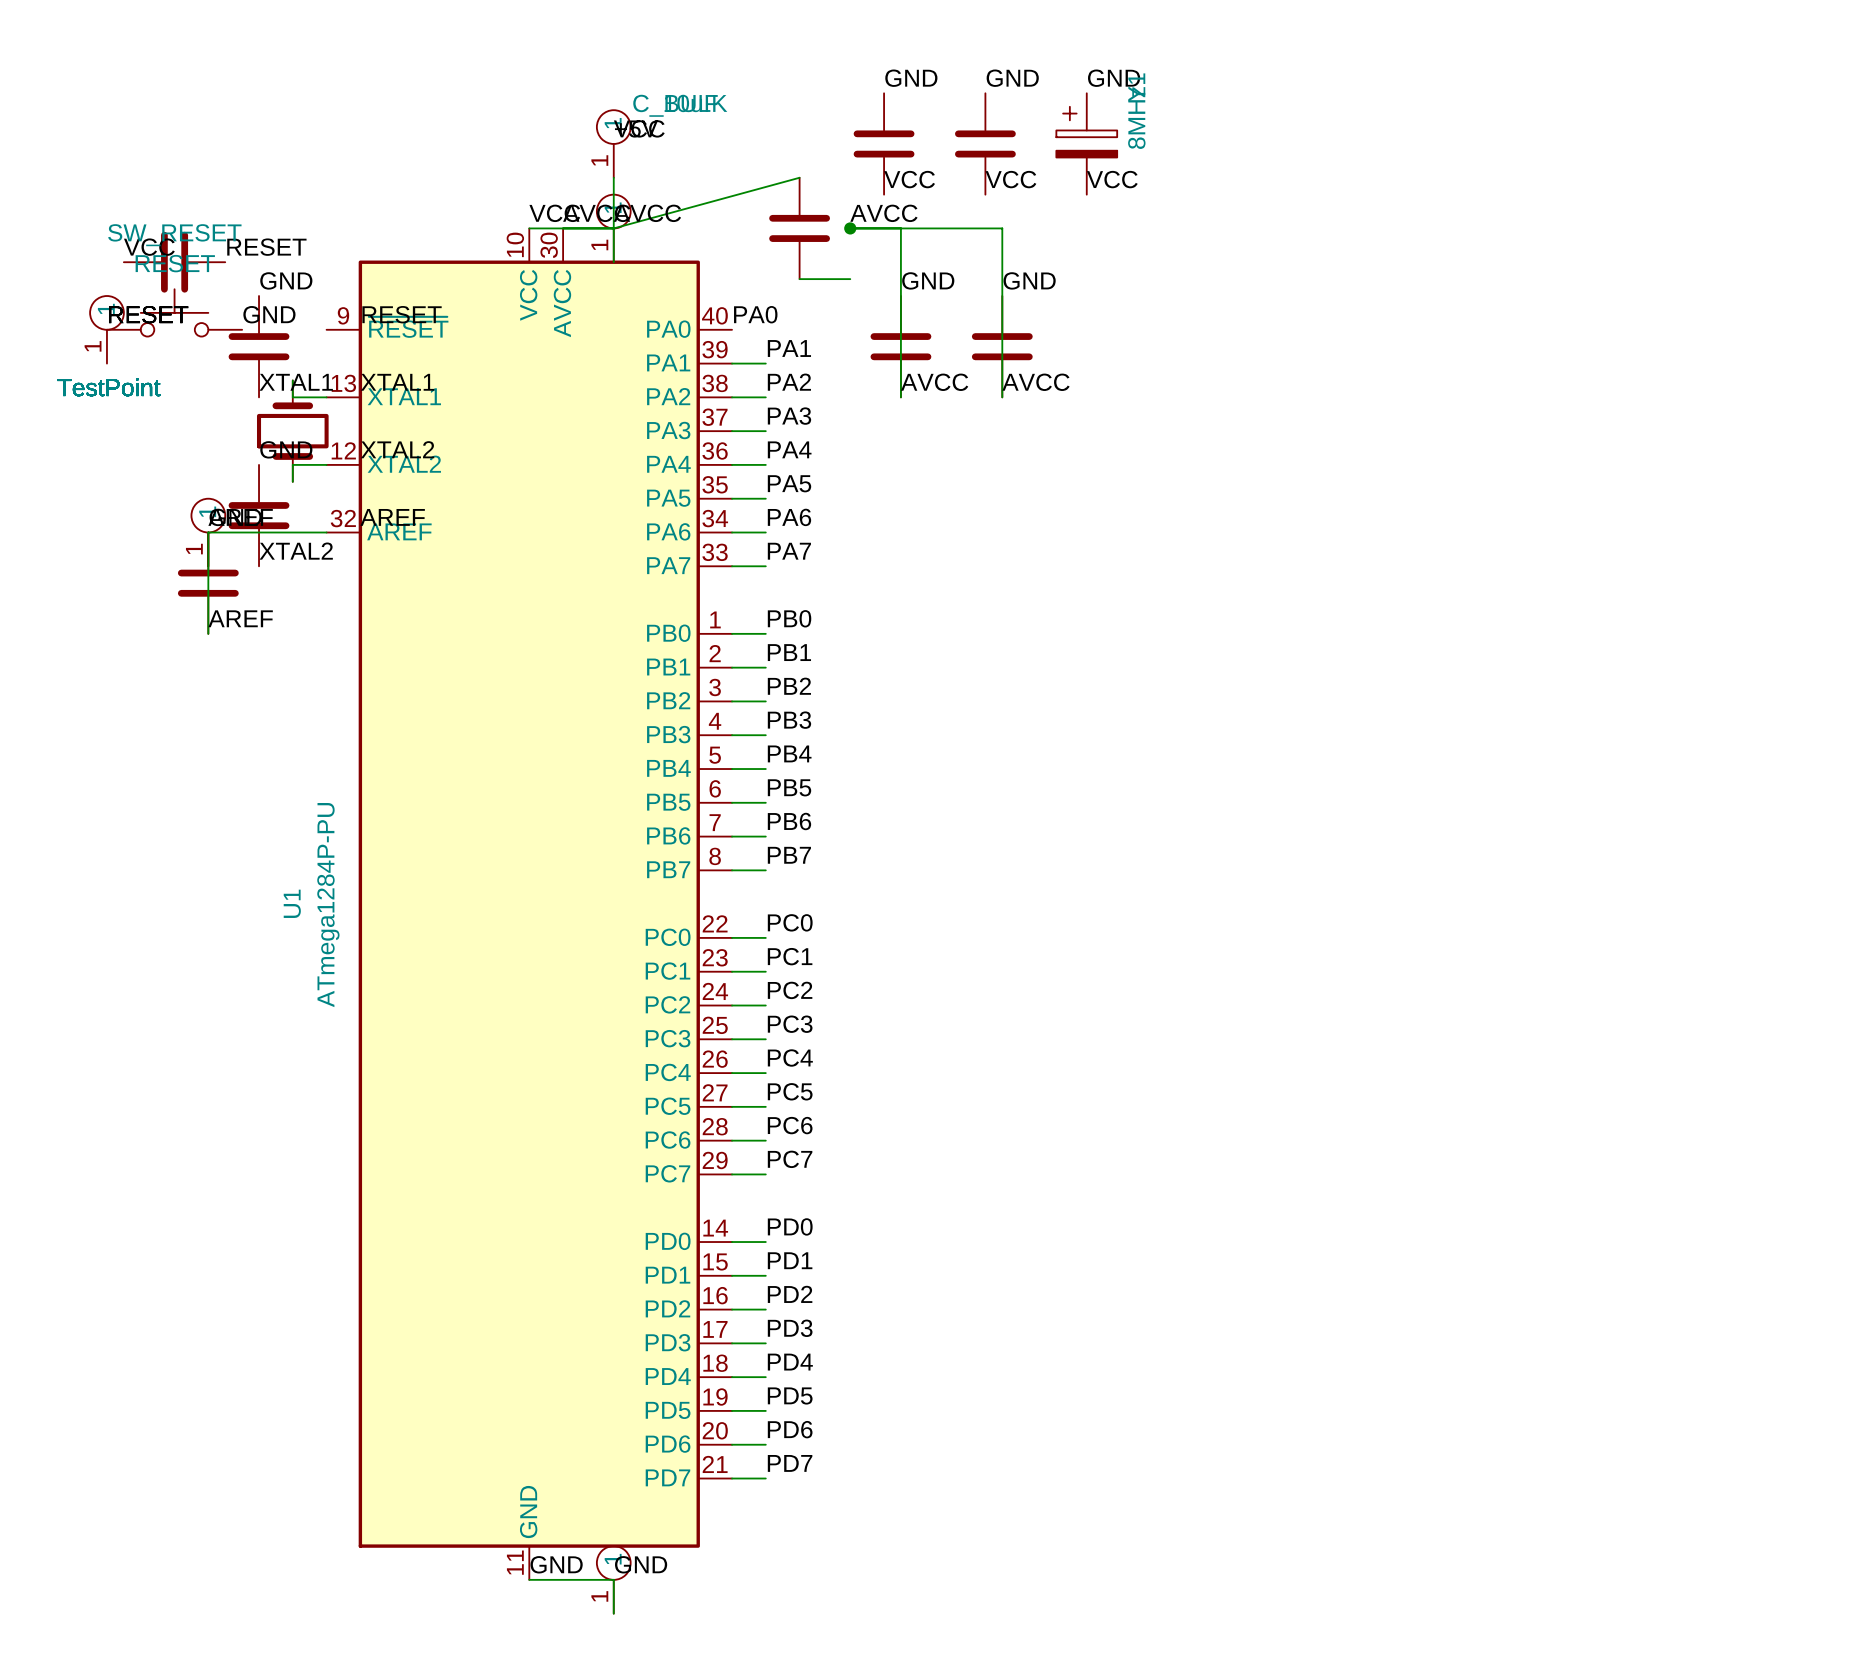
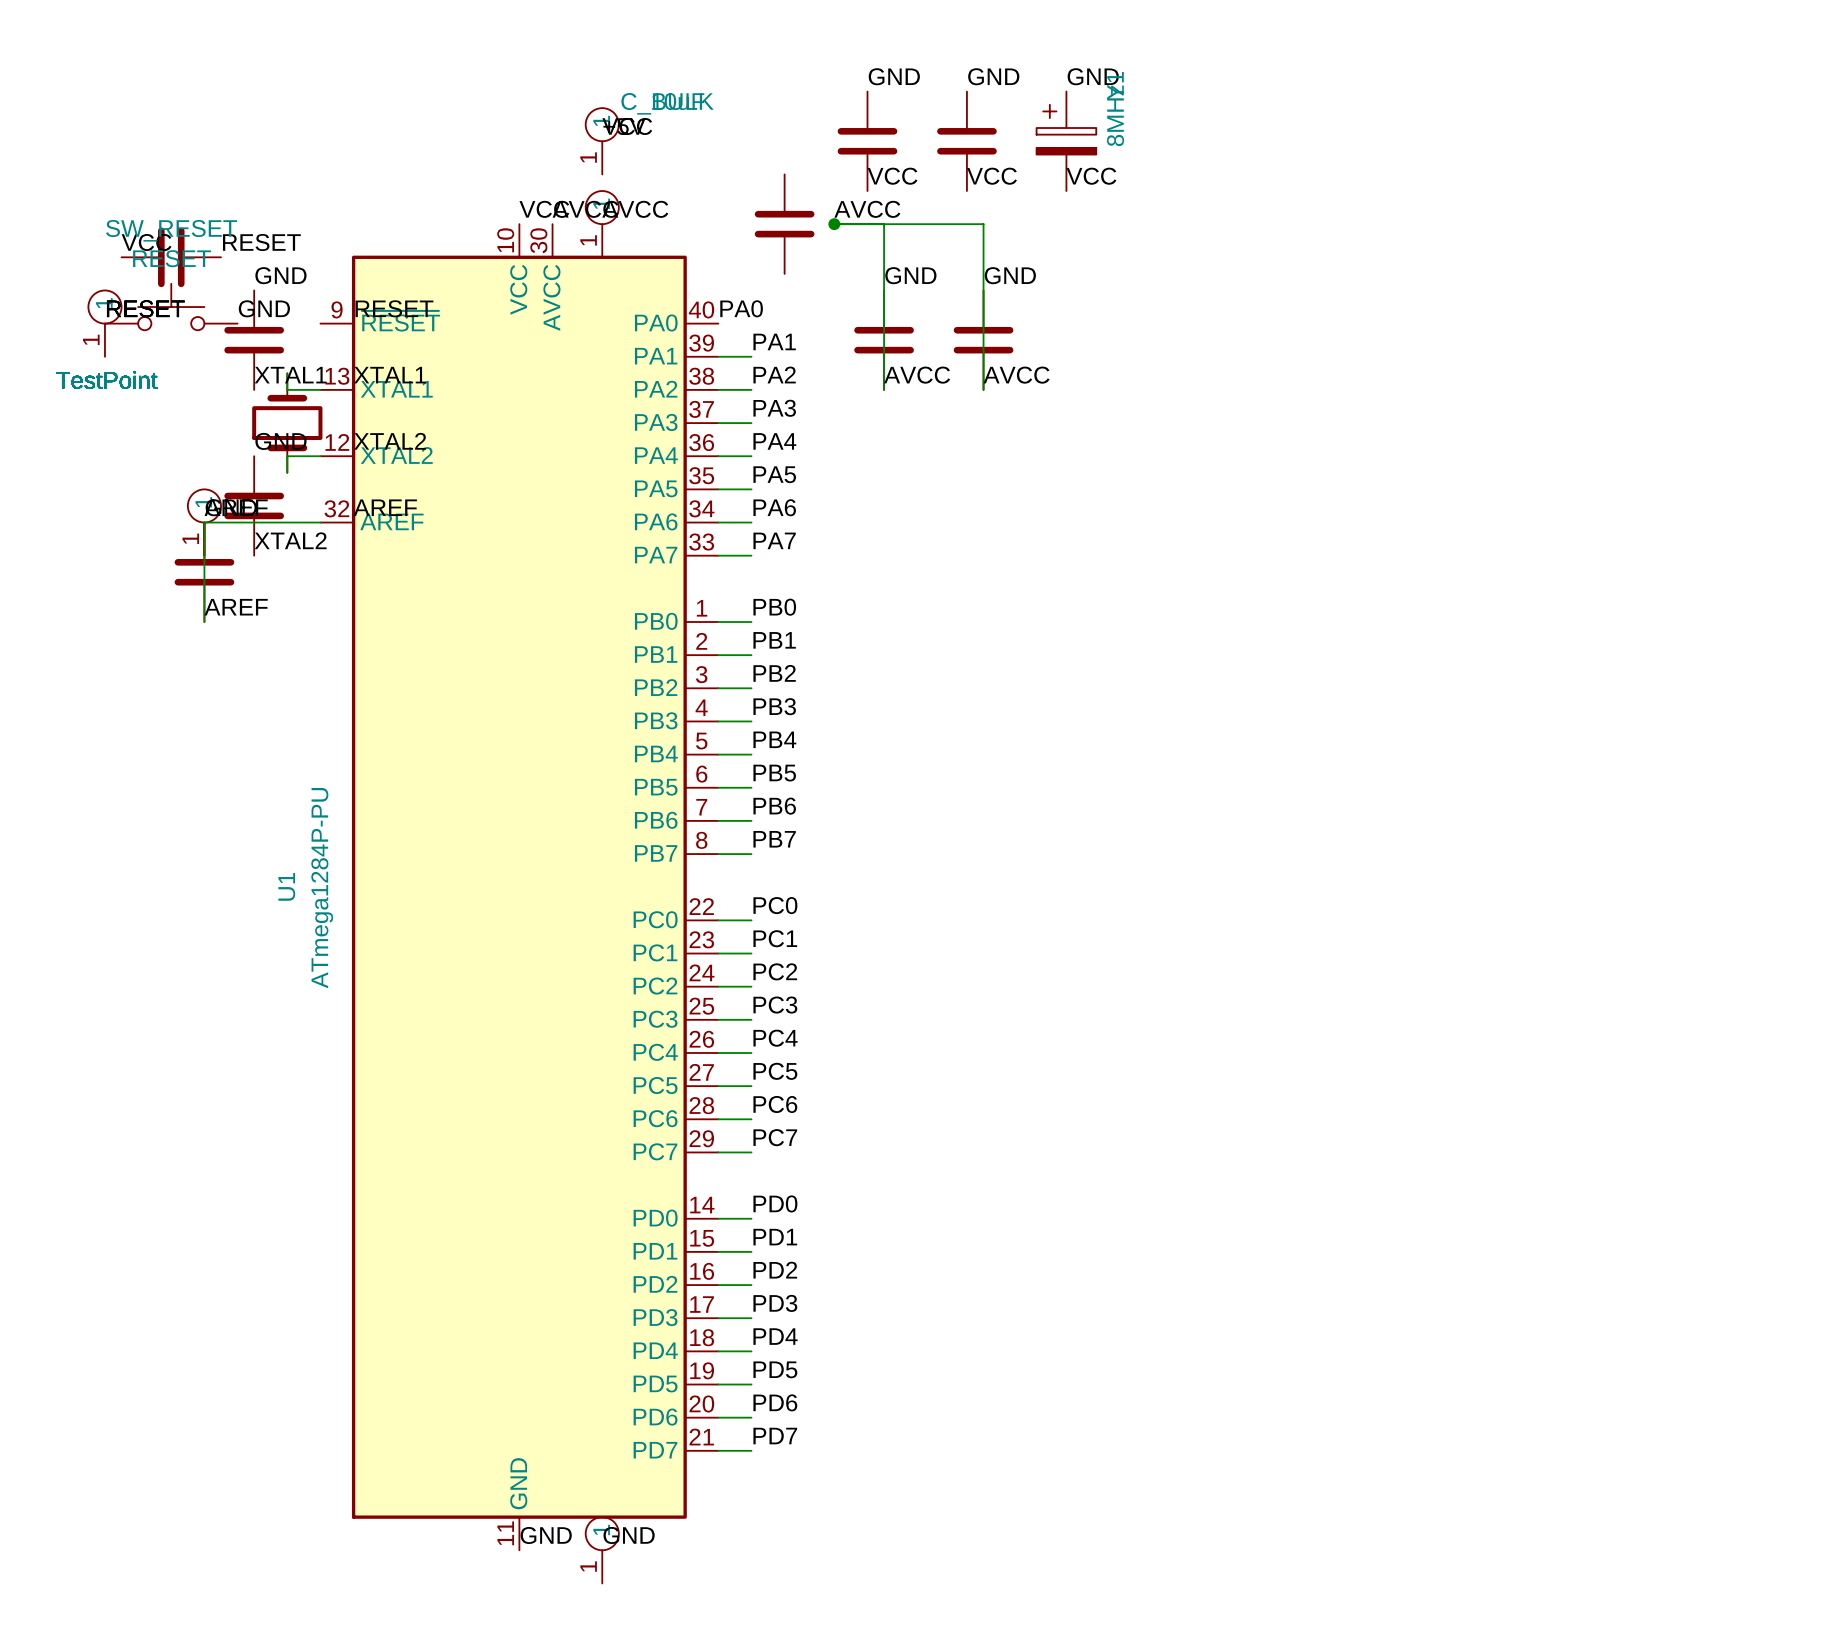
wire: (613, 177) (613, 262) -> none
wire: (799, 177) (613, 228) (529, 228) -> none
wire: (799, 279) (850, 279) -> none
wire: (529, 1579) (613, 1579) (613, 1613) -> none

